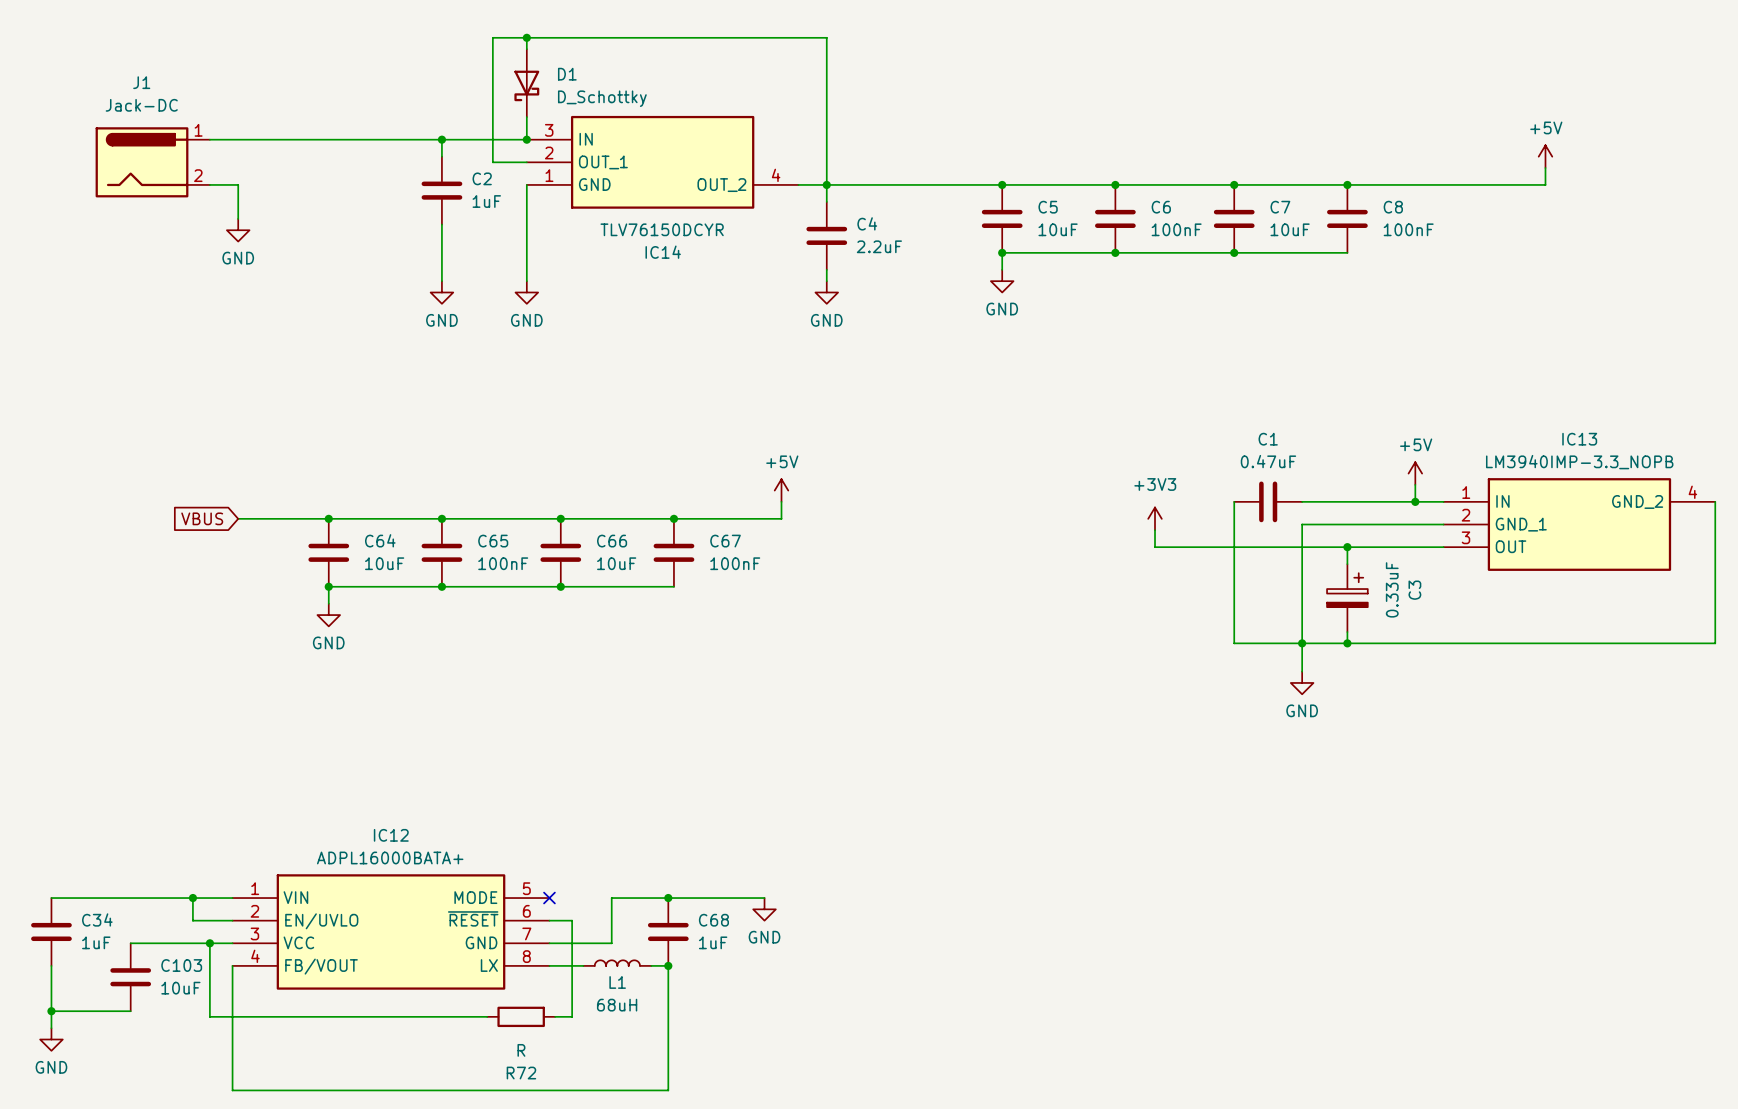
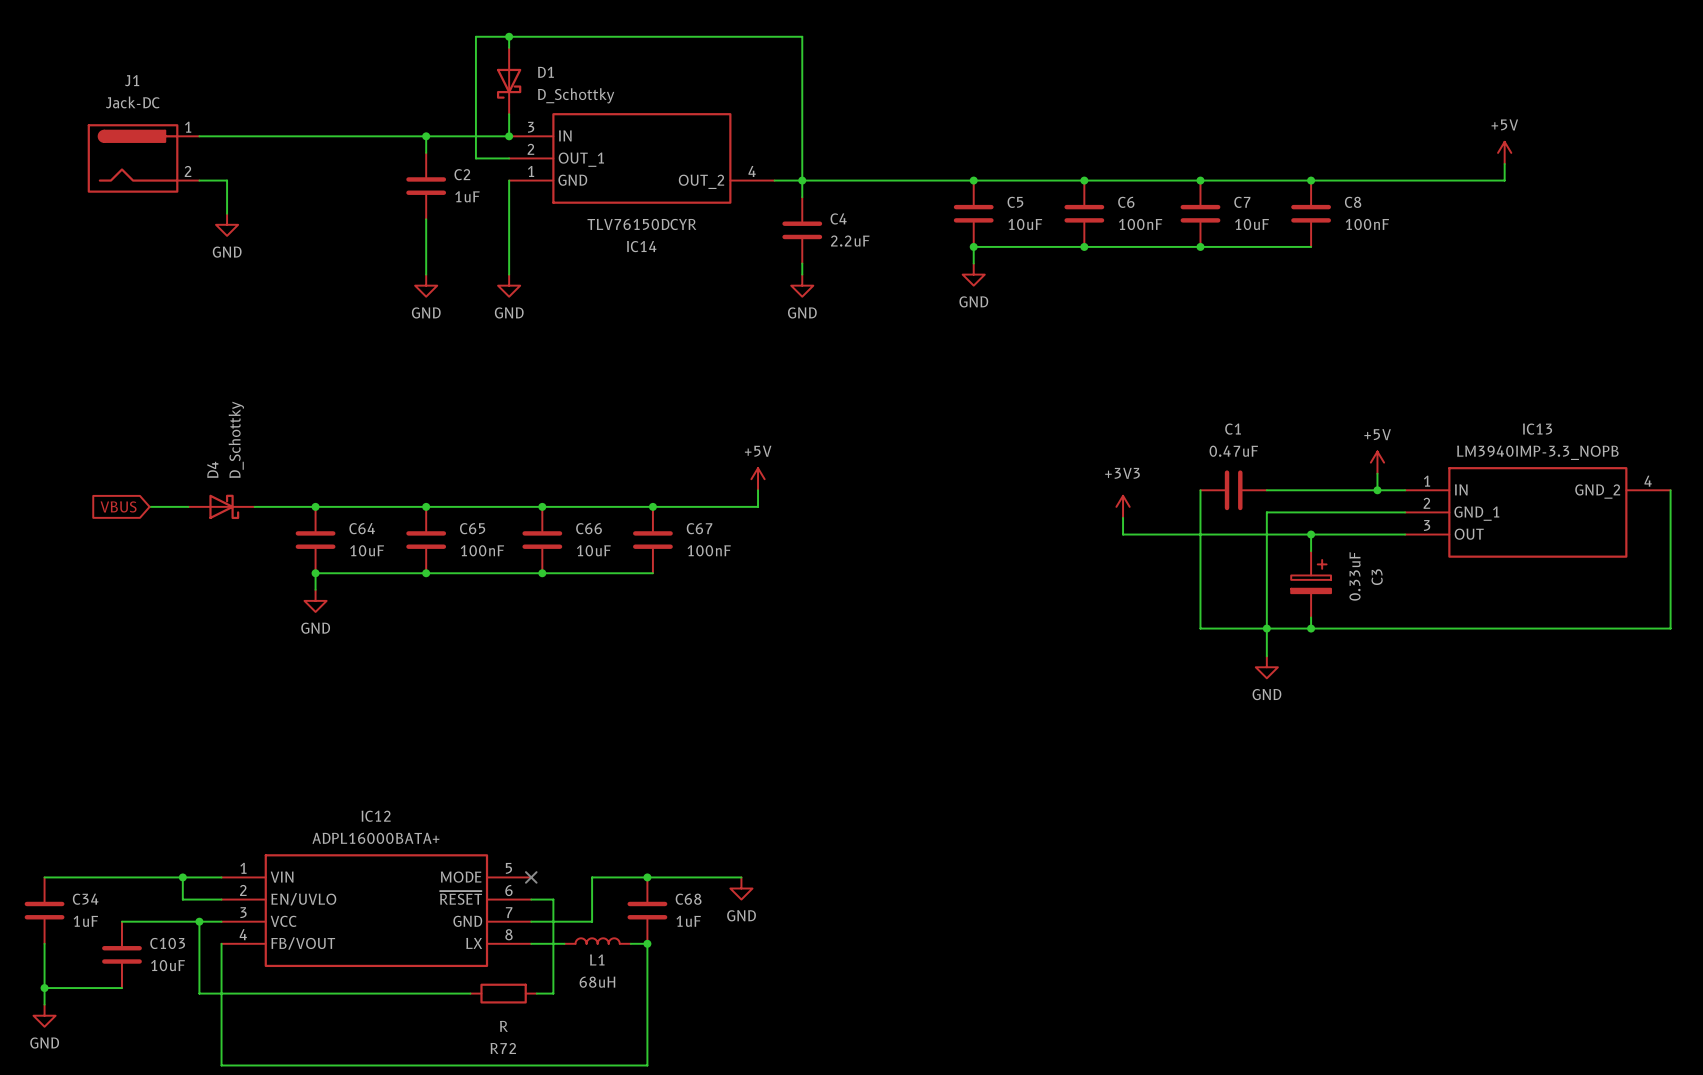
wire: none -> (149, 506) (188, 506)
global label position: VBUS (202, 518) -> VBUS (118, 506)
D4: none -> D_Schottky (221, 506)

